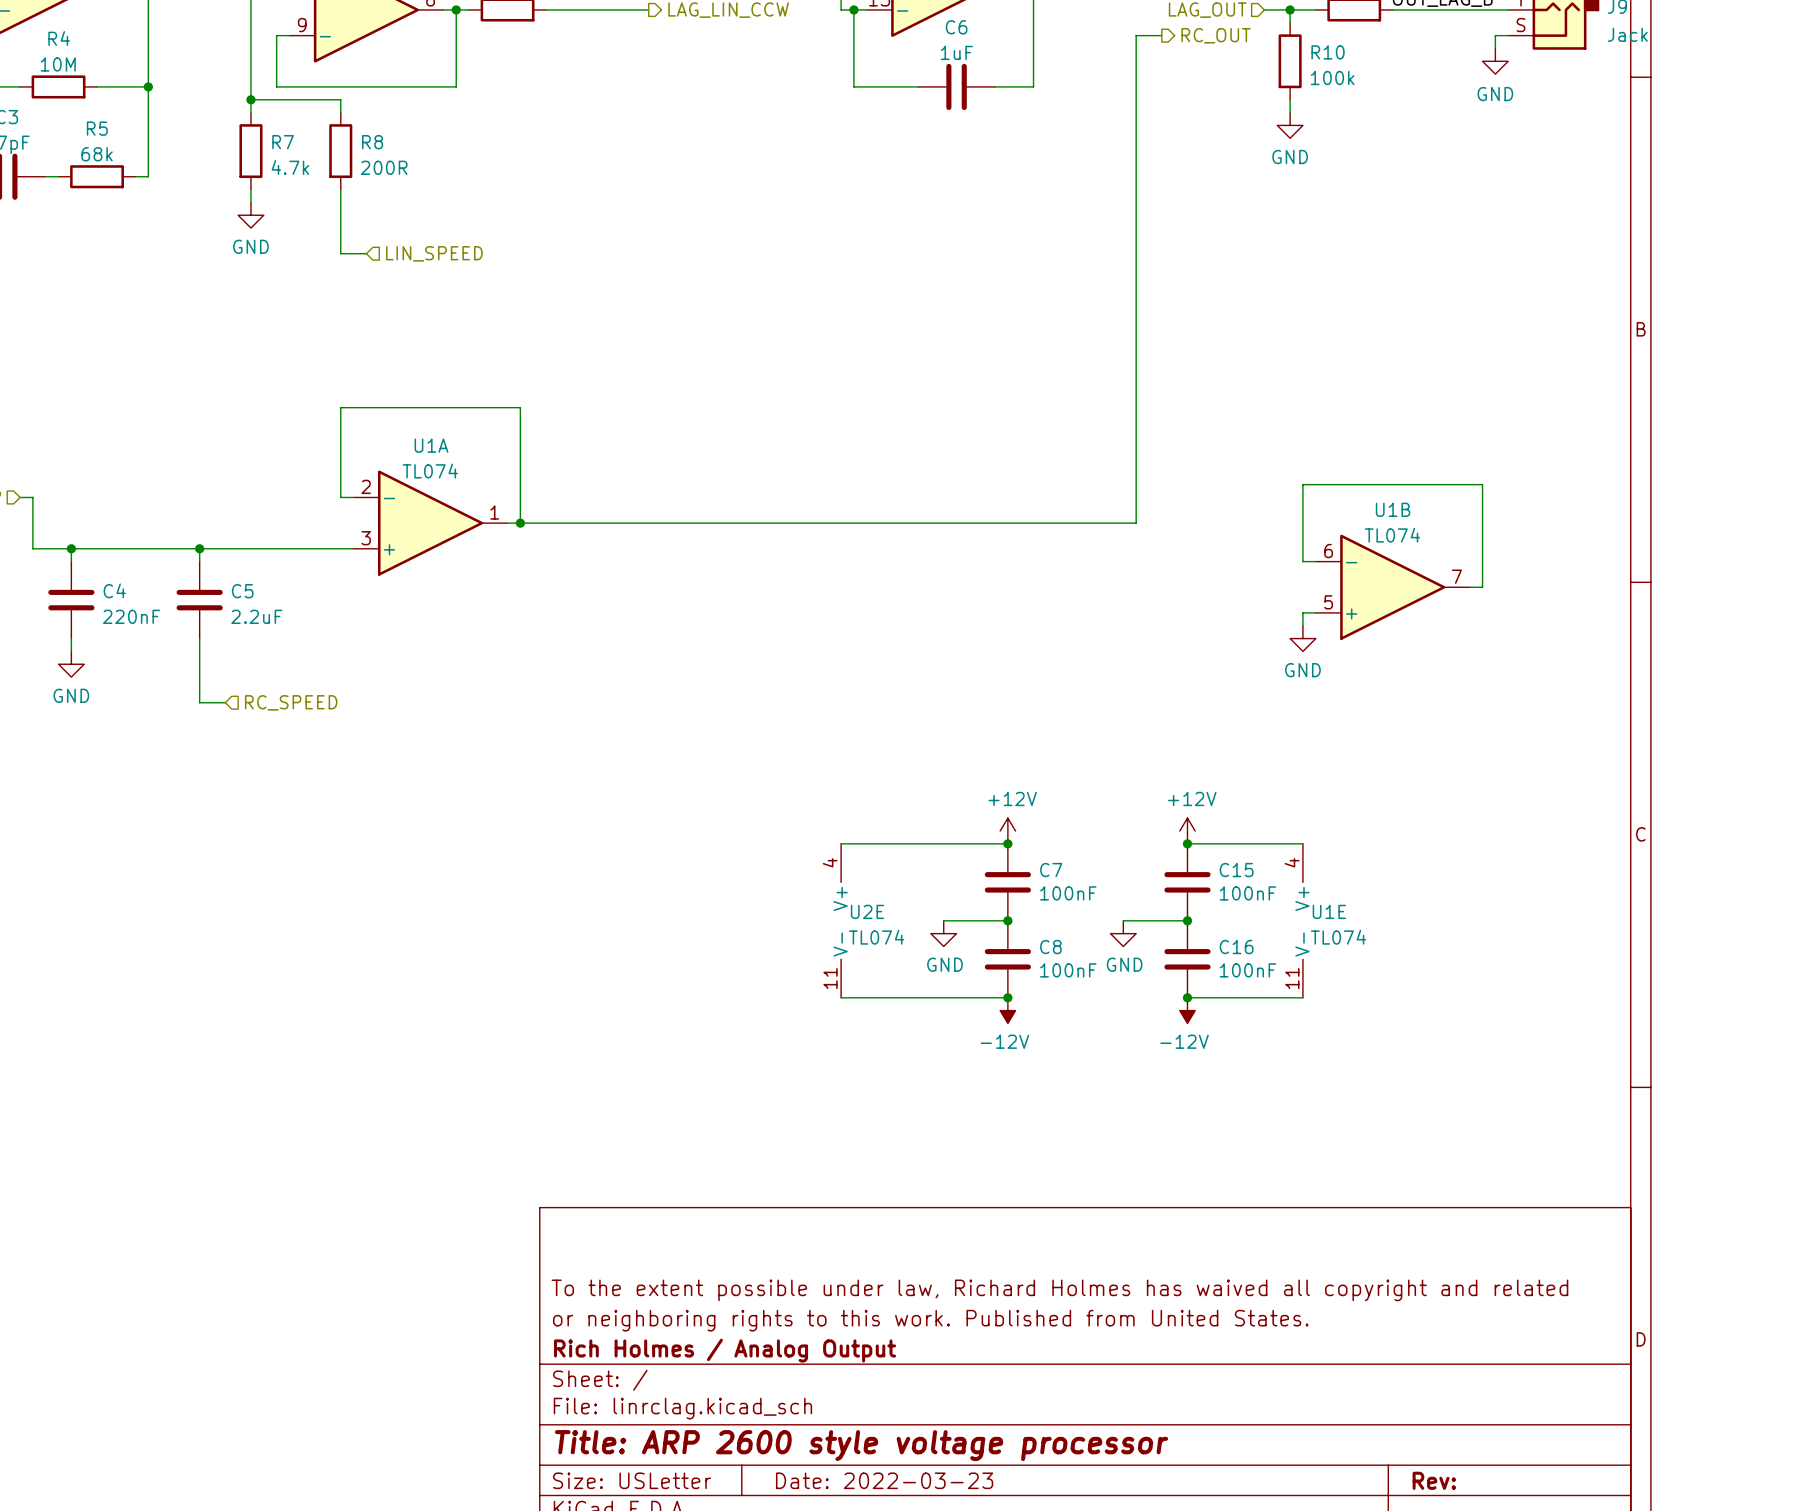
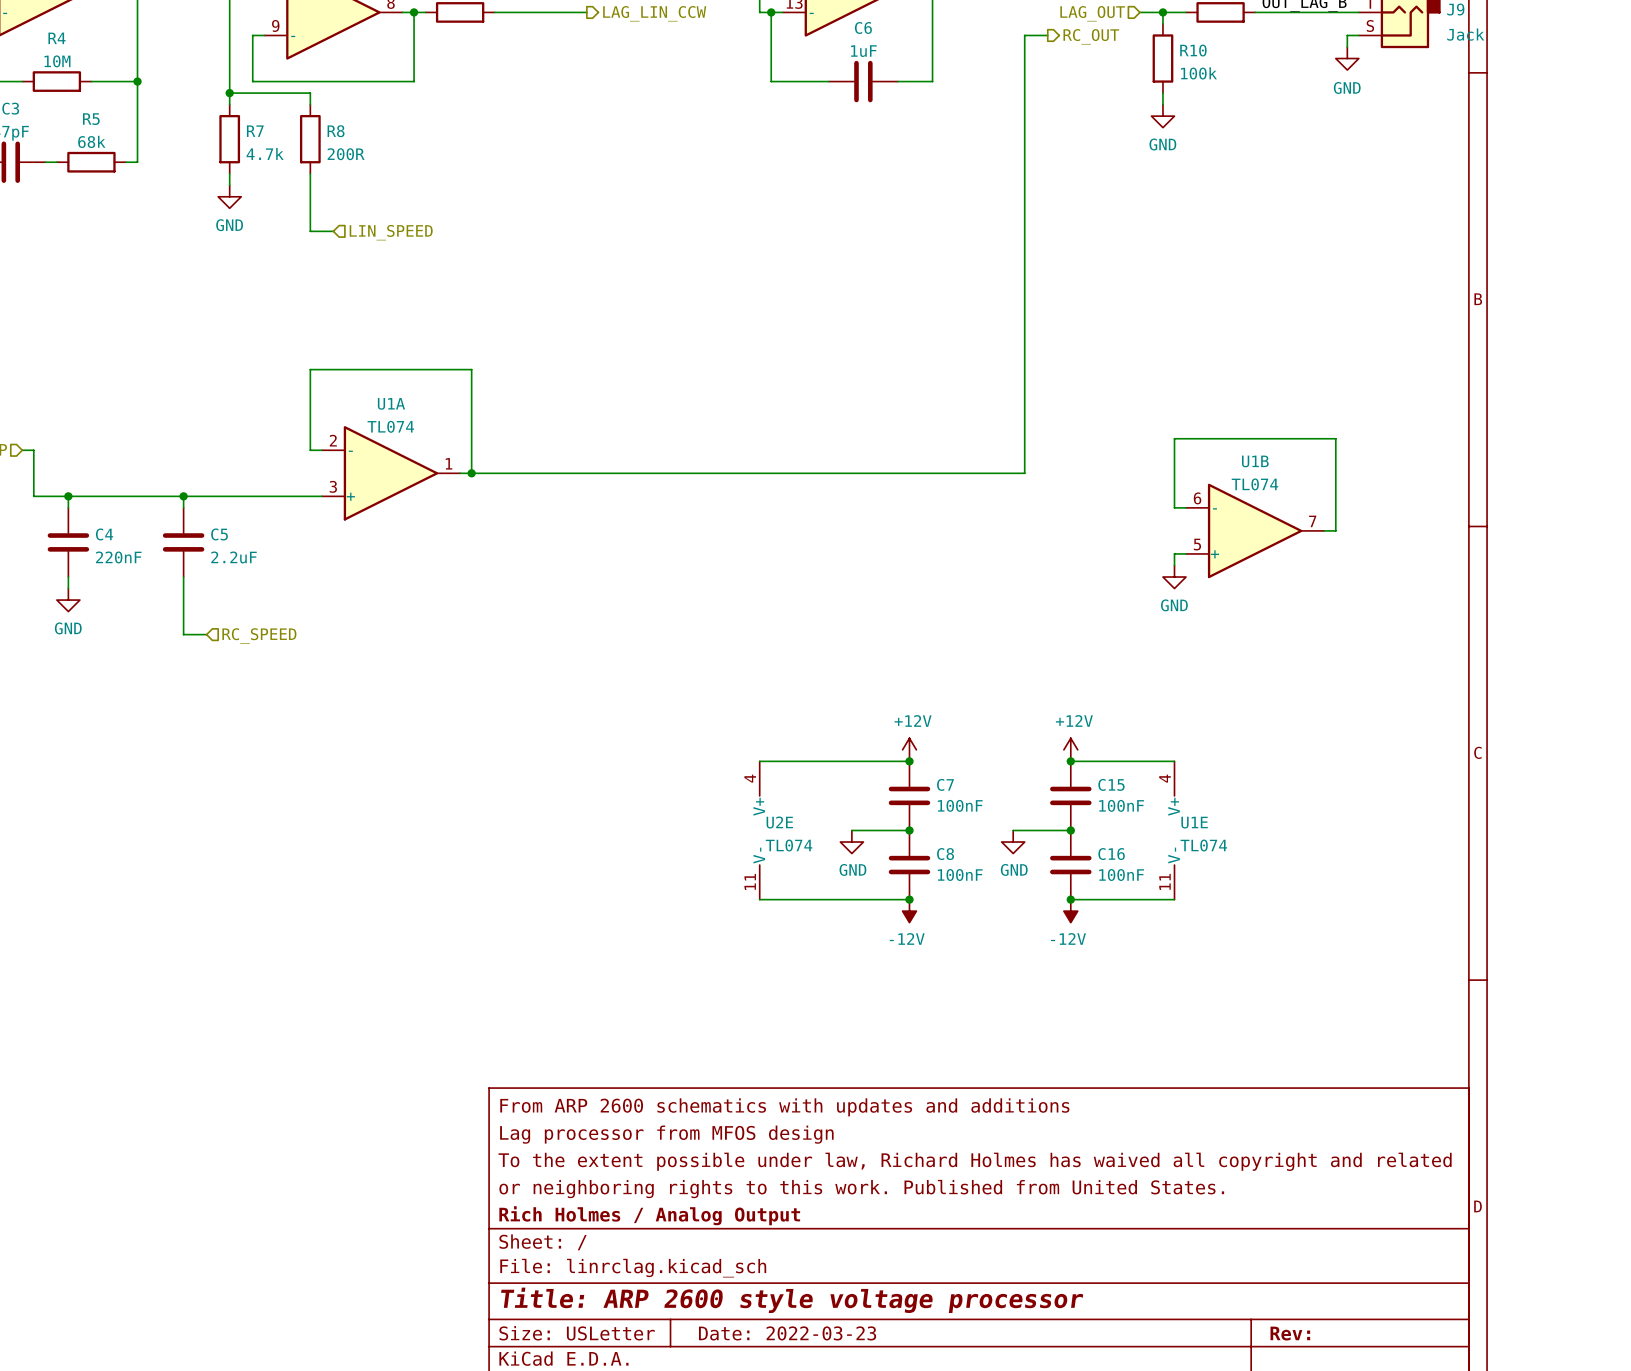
title block: none -> From ARP 2600 schematics with updates and additions (784, 1107)
title block: none -> Lag processor from MFOS design (666, 1134)

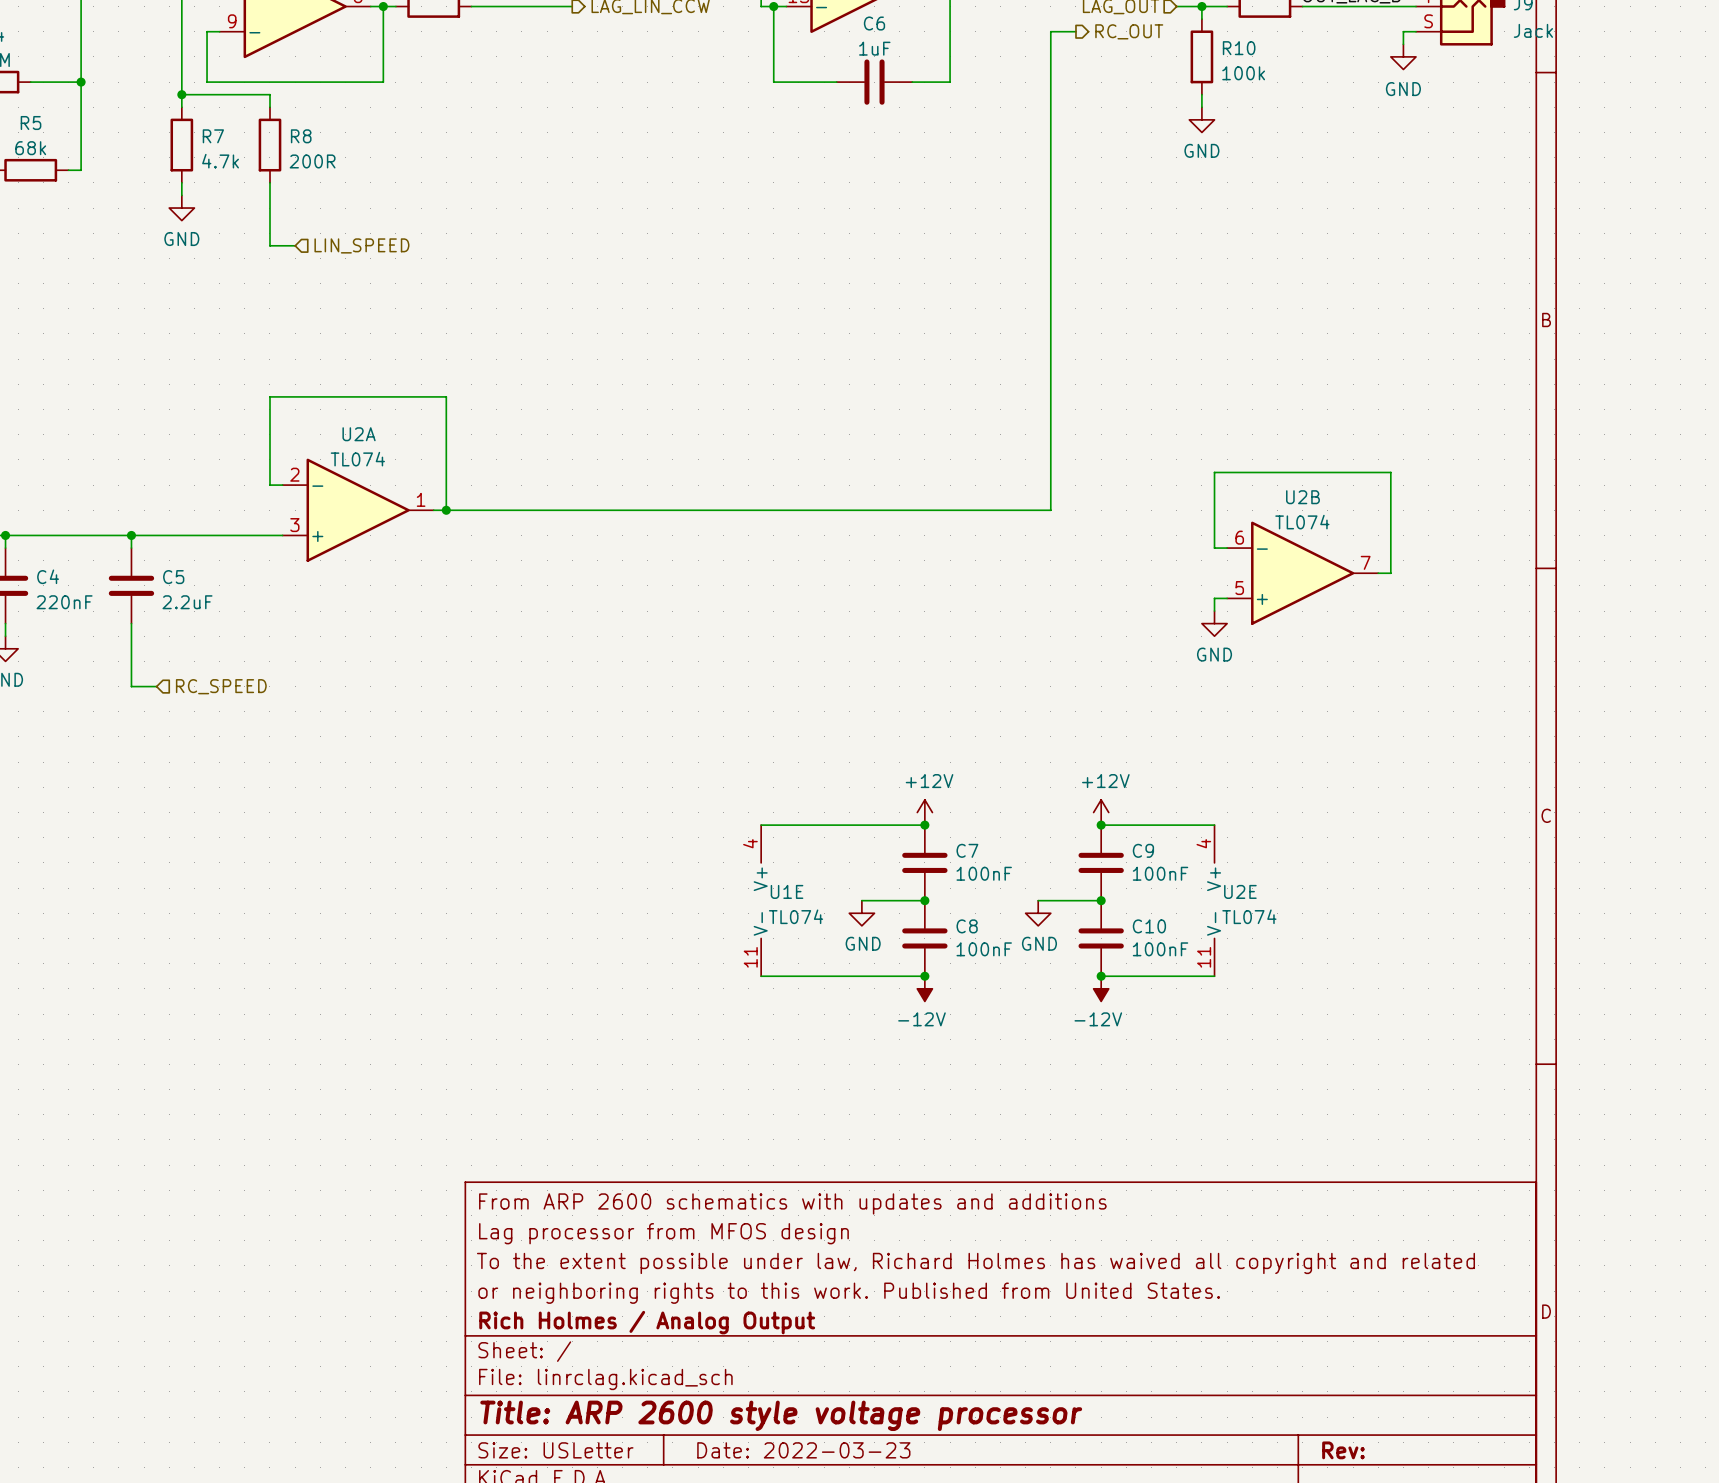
U1A name: U1A (391, 403) -> U2A (359, 434)
U1B name: U1B (1255, 461) -> U2B (1302, 497)
C15 name: C15 (1111, 784) -> C9 (1143, 850)
U2E name: U2E (779, 822) -> U1E (787, 891)
U1E name: U1E (1194, 822) -> U2E (1240, 891)
C16 name: C16 (1111, 854) -> C10 (1149, 926)

